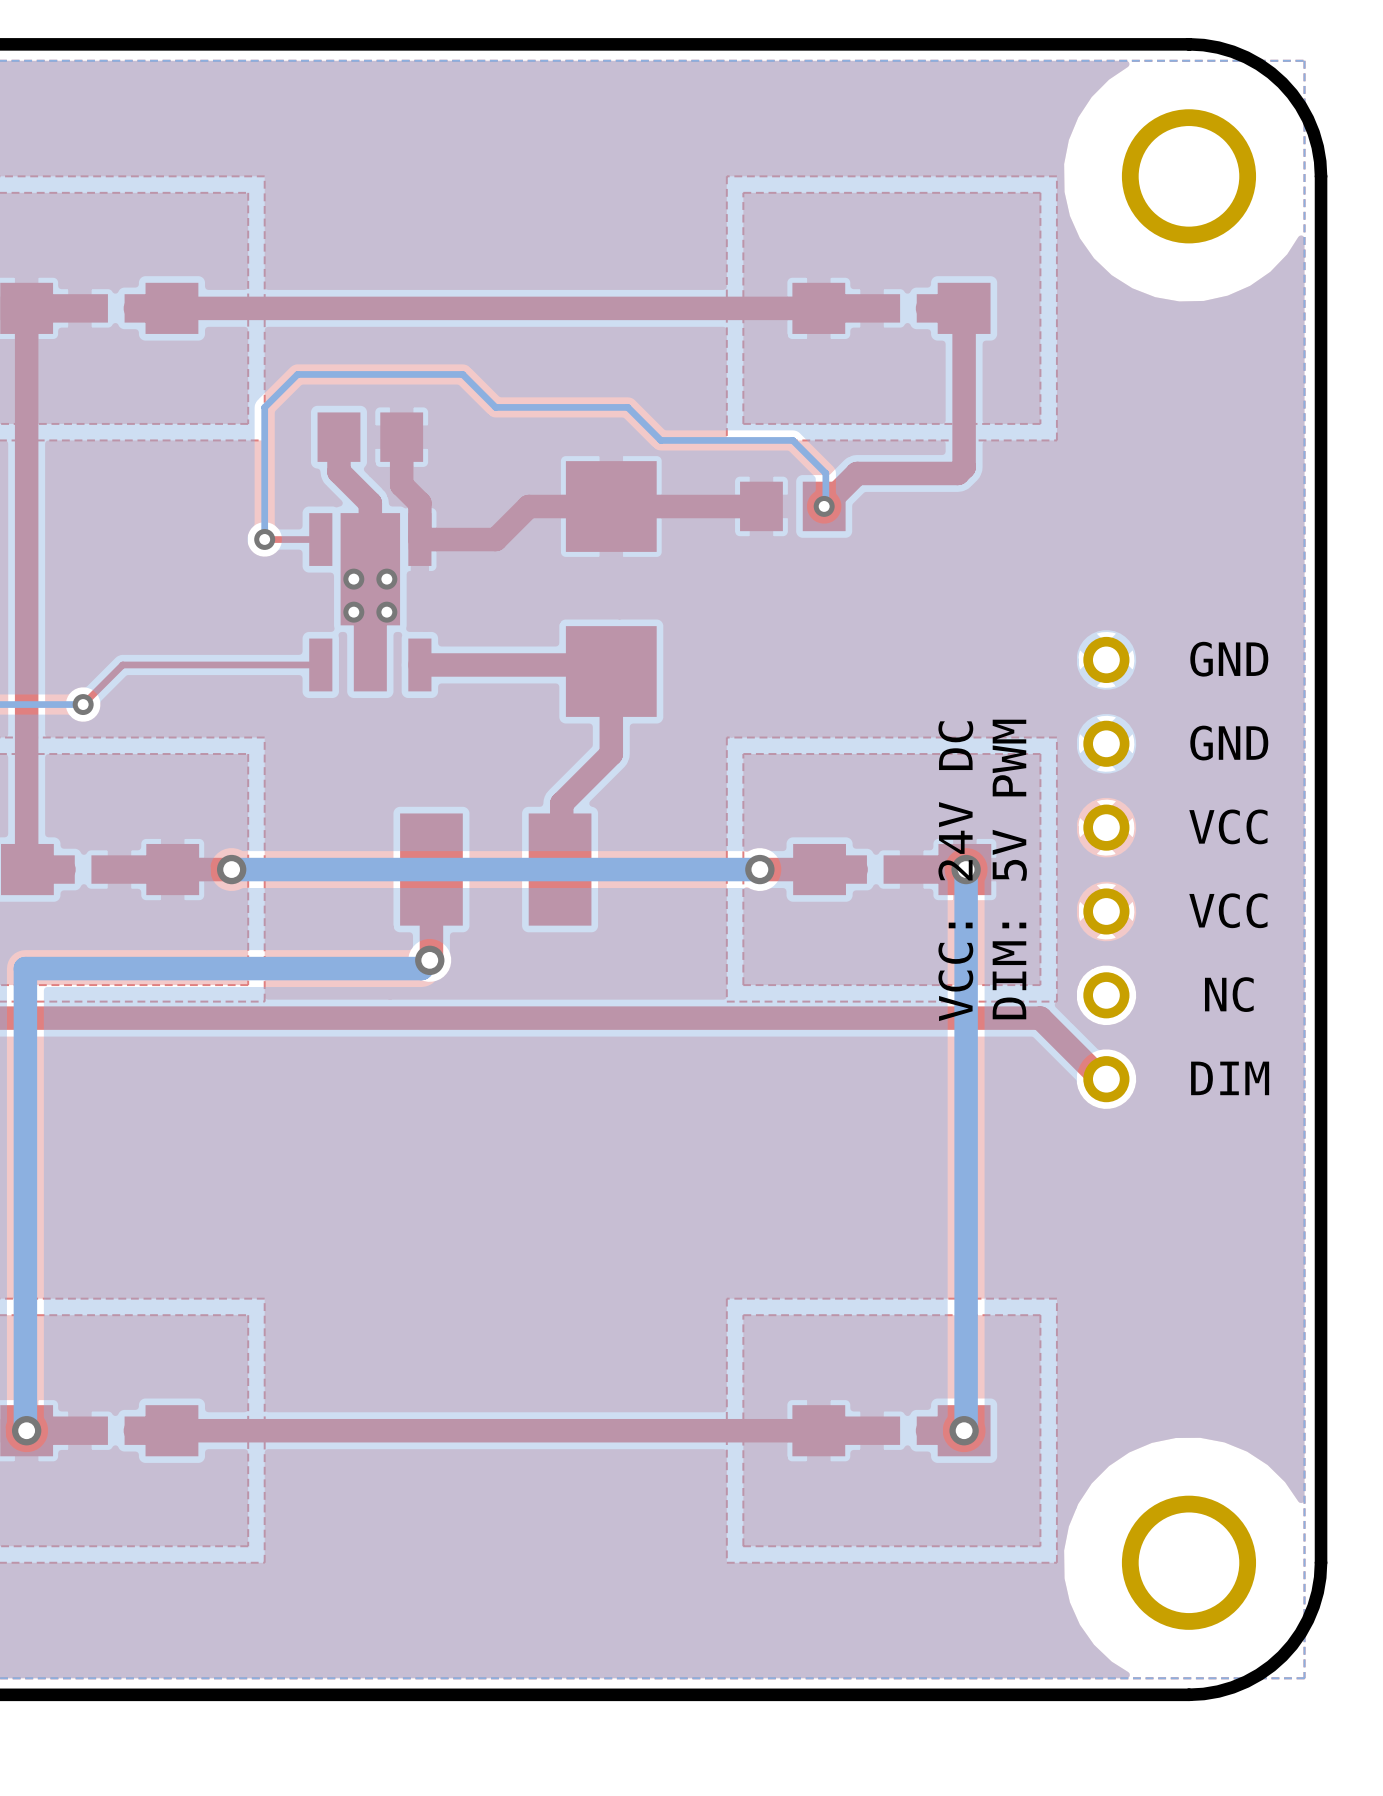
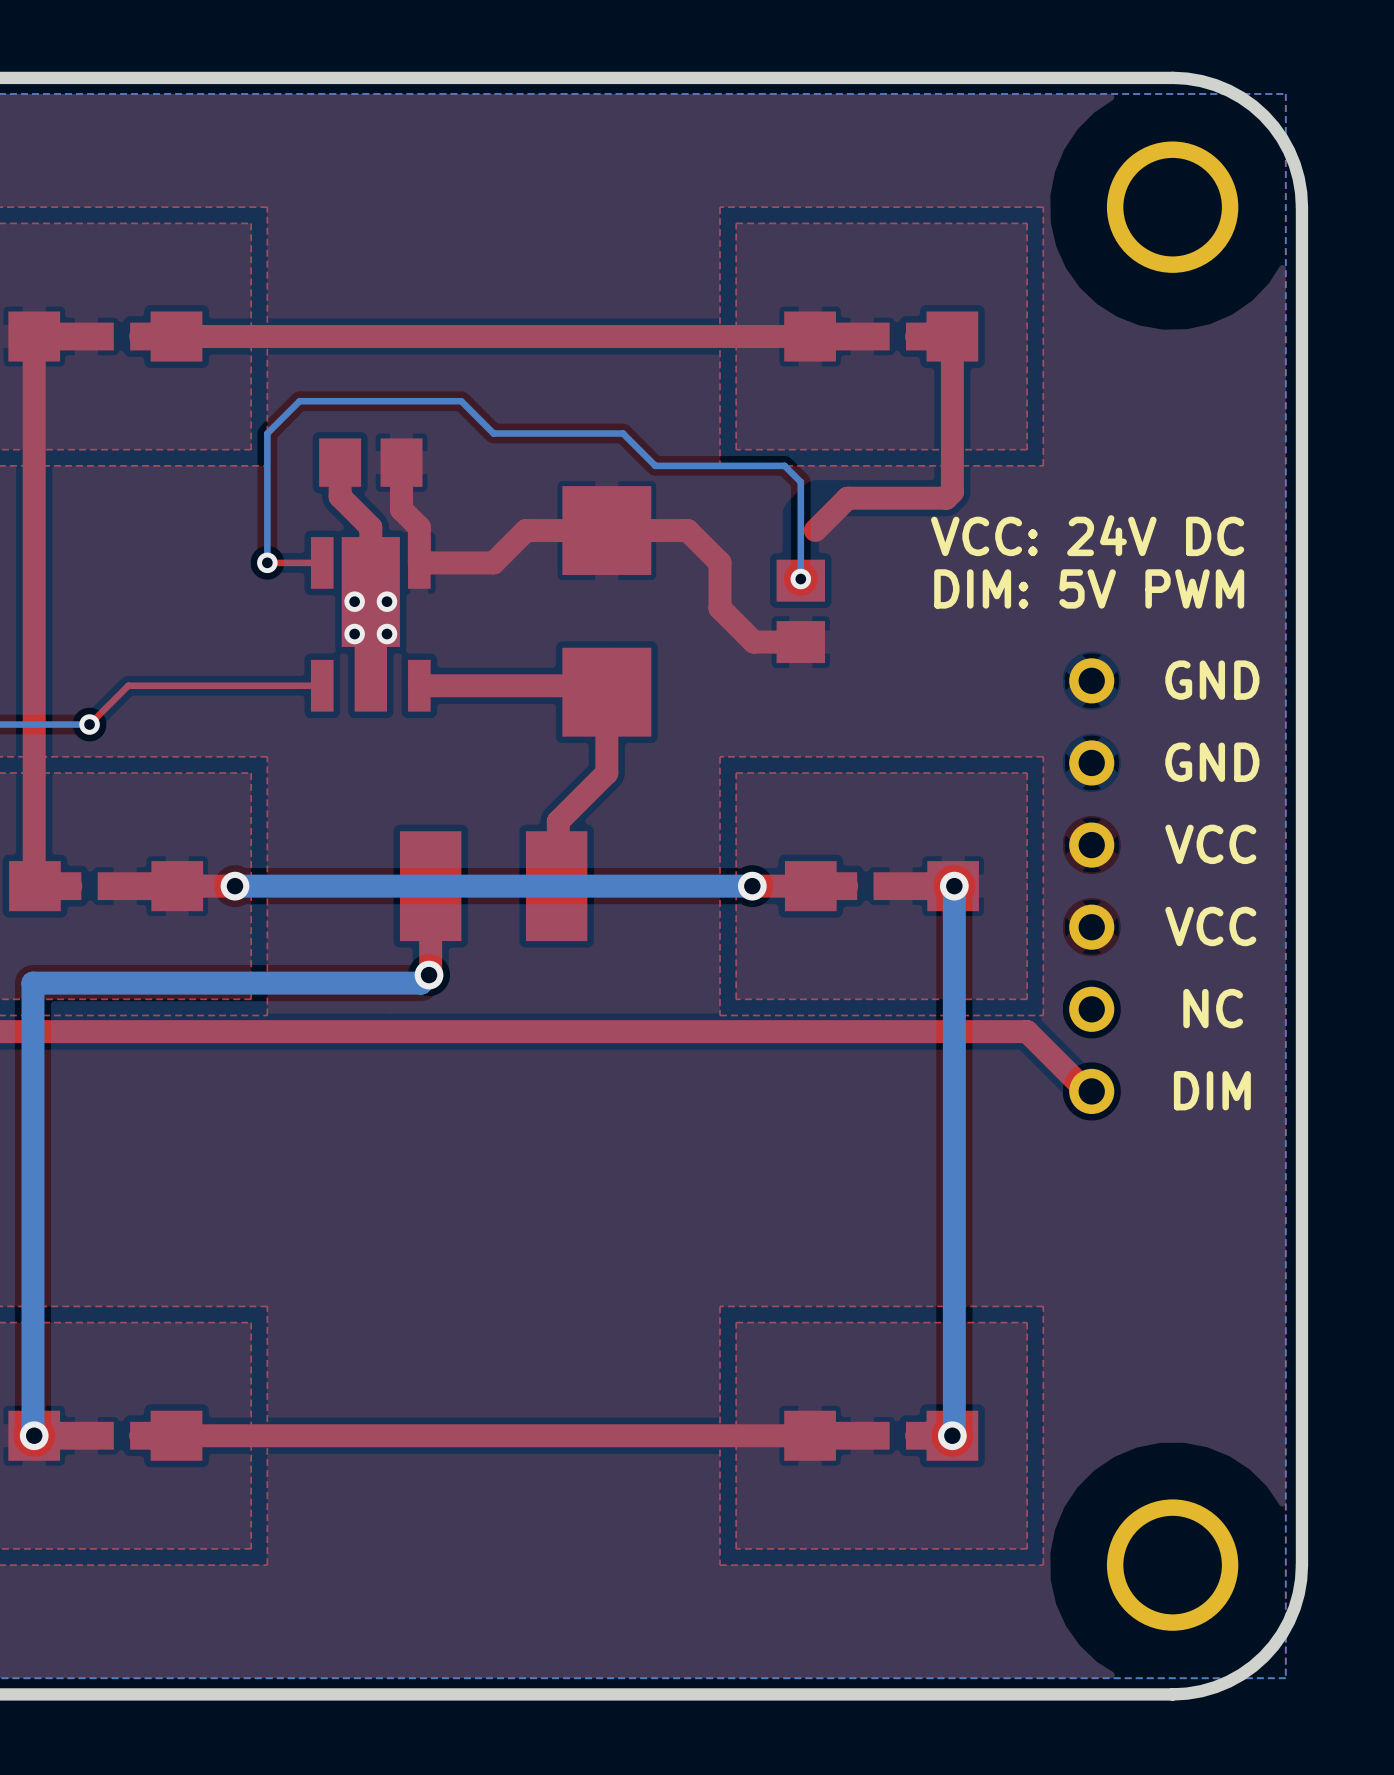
bottom track: (809, 456) (825, 473) (825, 504) (824, 506) -> (800, 482) (800, 579)
top track: (761, 506) (693, 506) -> (800, 642) (753, 642) (719, 608) (719, 562) (687, 530)
part rotation: 0° (792, 506) -> 90° clockwise (800, 611)
part position: (792, 506) -> (800, 611)
via position: (824, 506) -> (800, 579)
text rotation: 0° (1009, 869) -> 90° clockwise (1089, 588)
text rotation: 0° (955, 871) -> 90° clockwise (1087, 535)

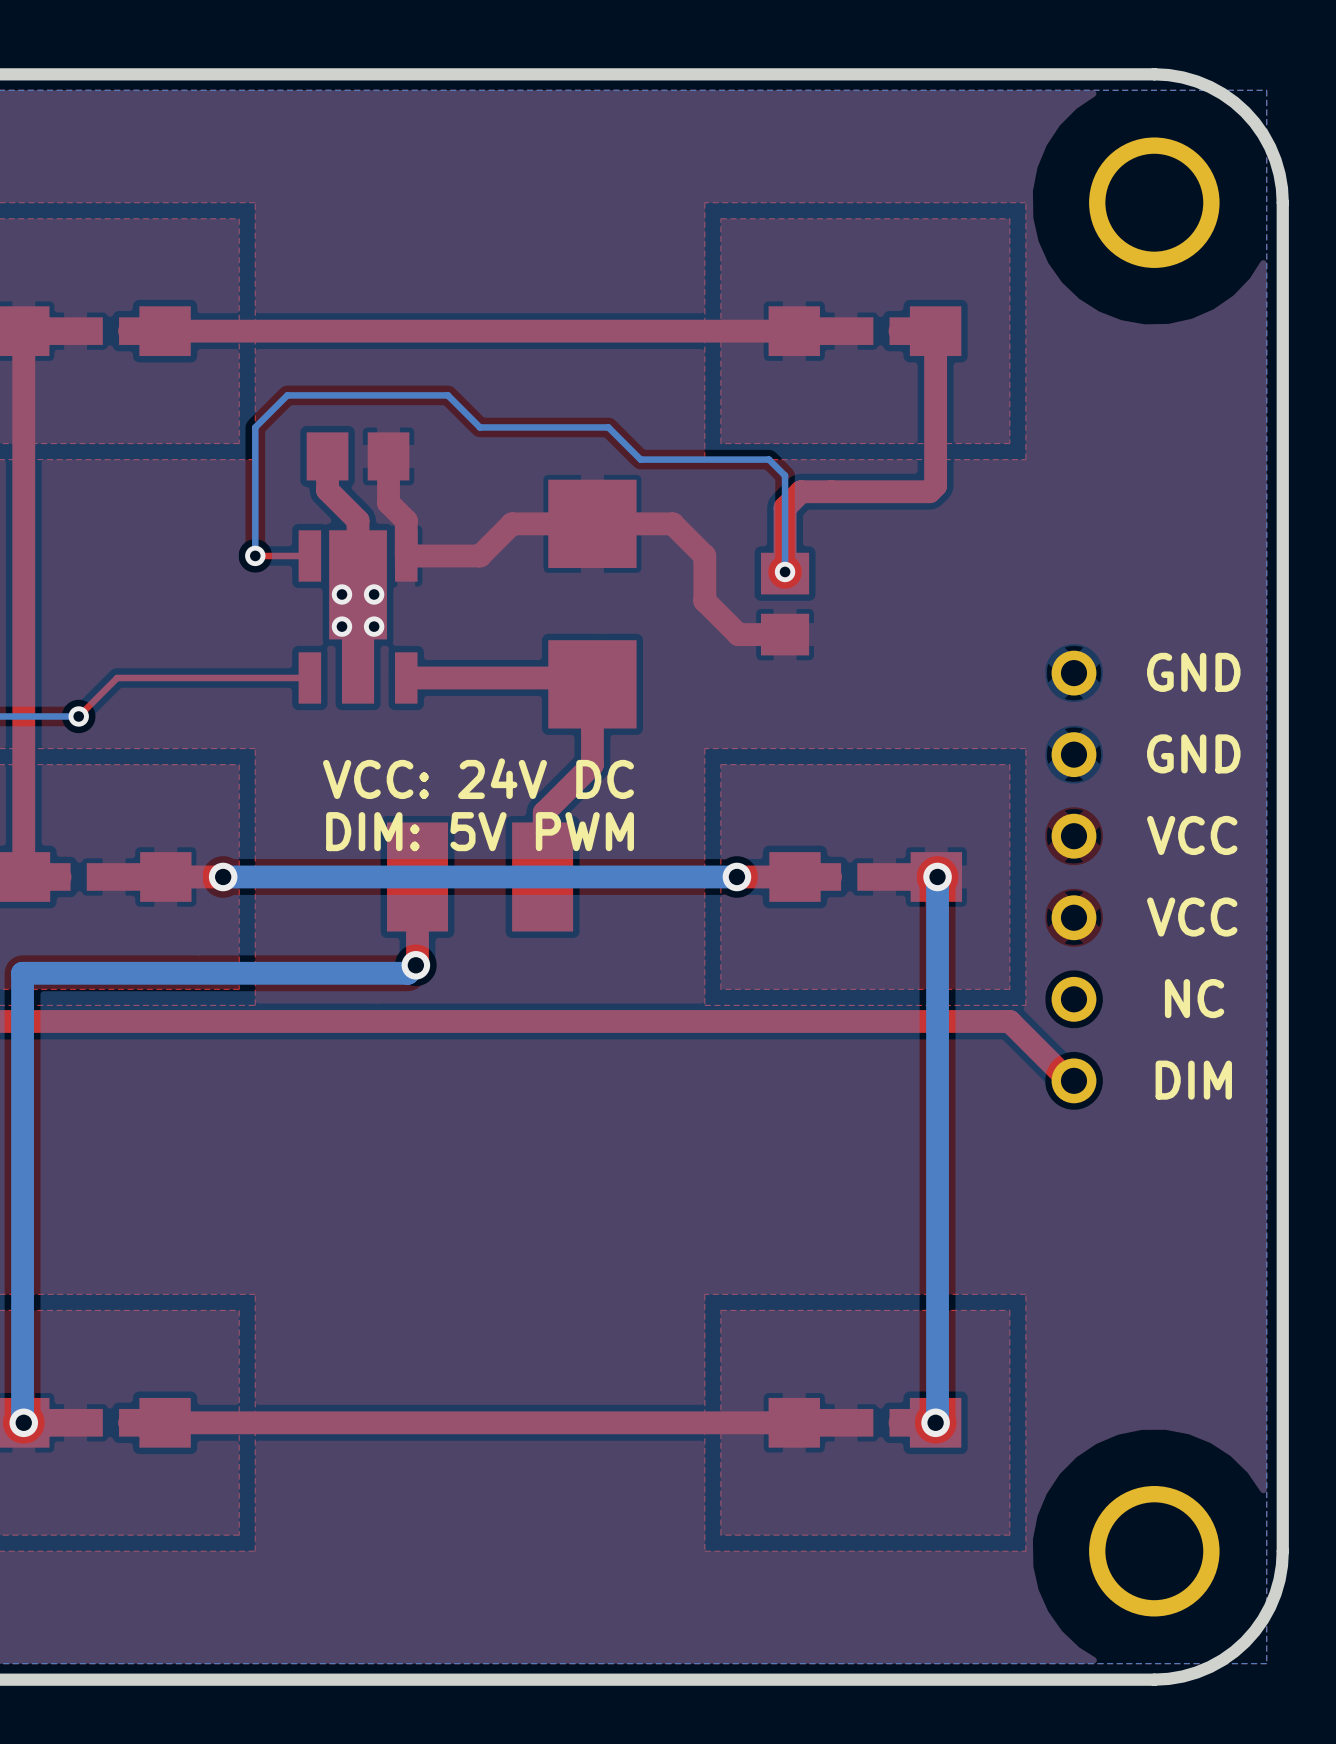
top track: (847, 498) (815, 530) -> (831, 491) (801, 491) (785, 507) (785, 573) (785, 571)
text position: VCC: 24V DC (1087, 535) -> VCC: 24V DC (478, 778)
text position: DIM: 5V PWM (1089, 588) -> DIM: 5V PWM (480, 831)

